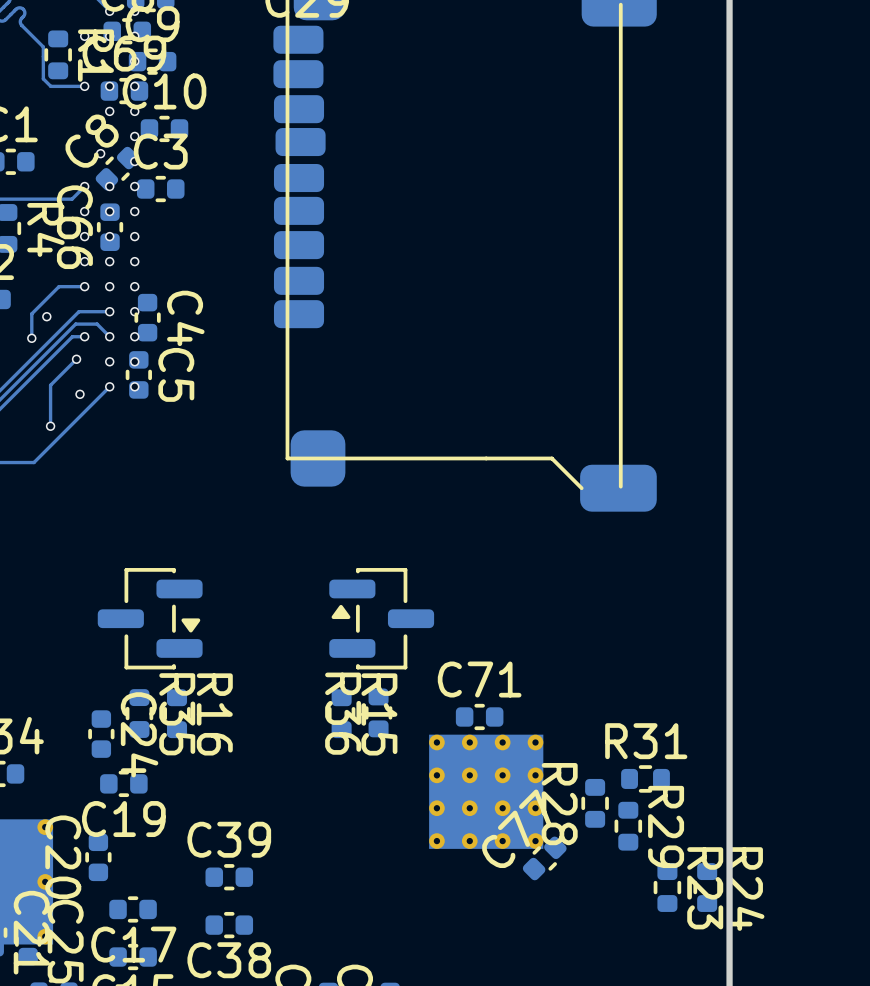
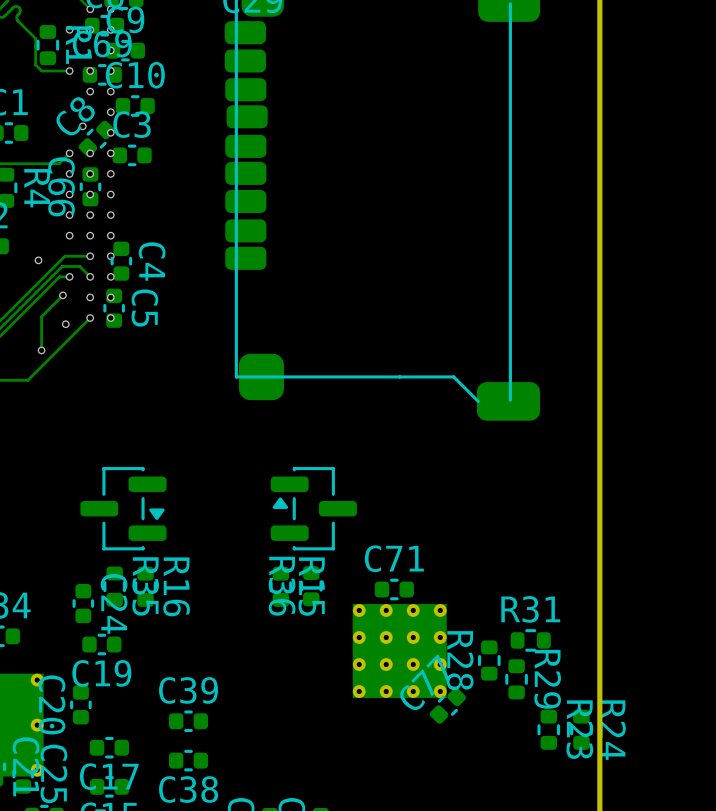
track: (84, 286) (59, 286) (31, 313) (31, 338) -> none
via: (31, 338) -> none

